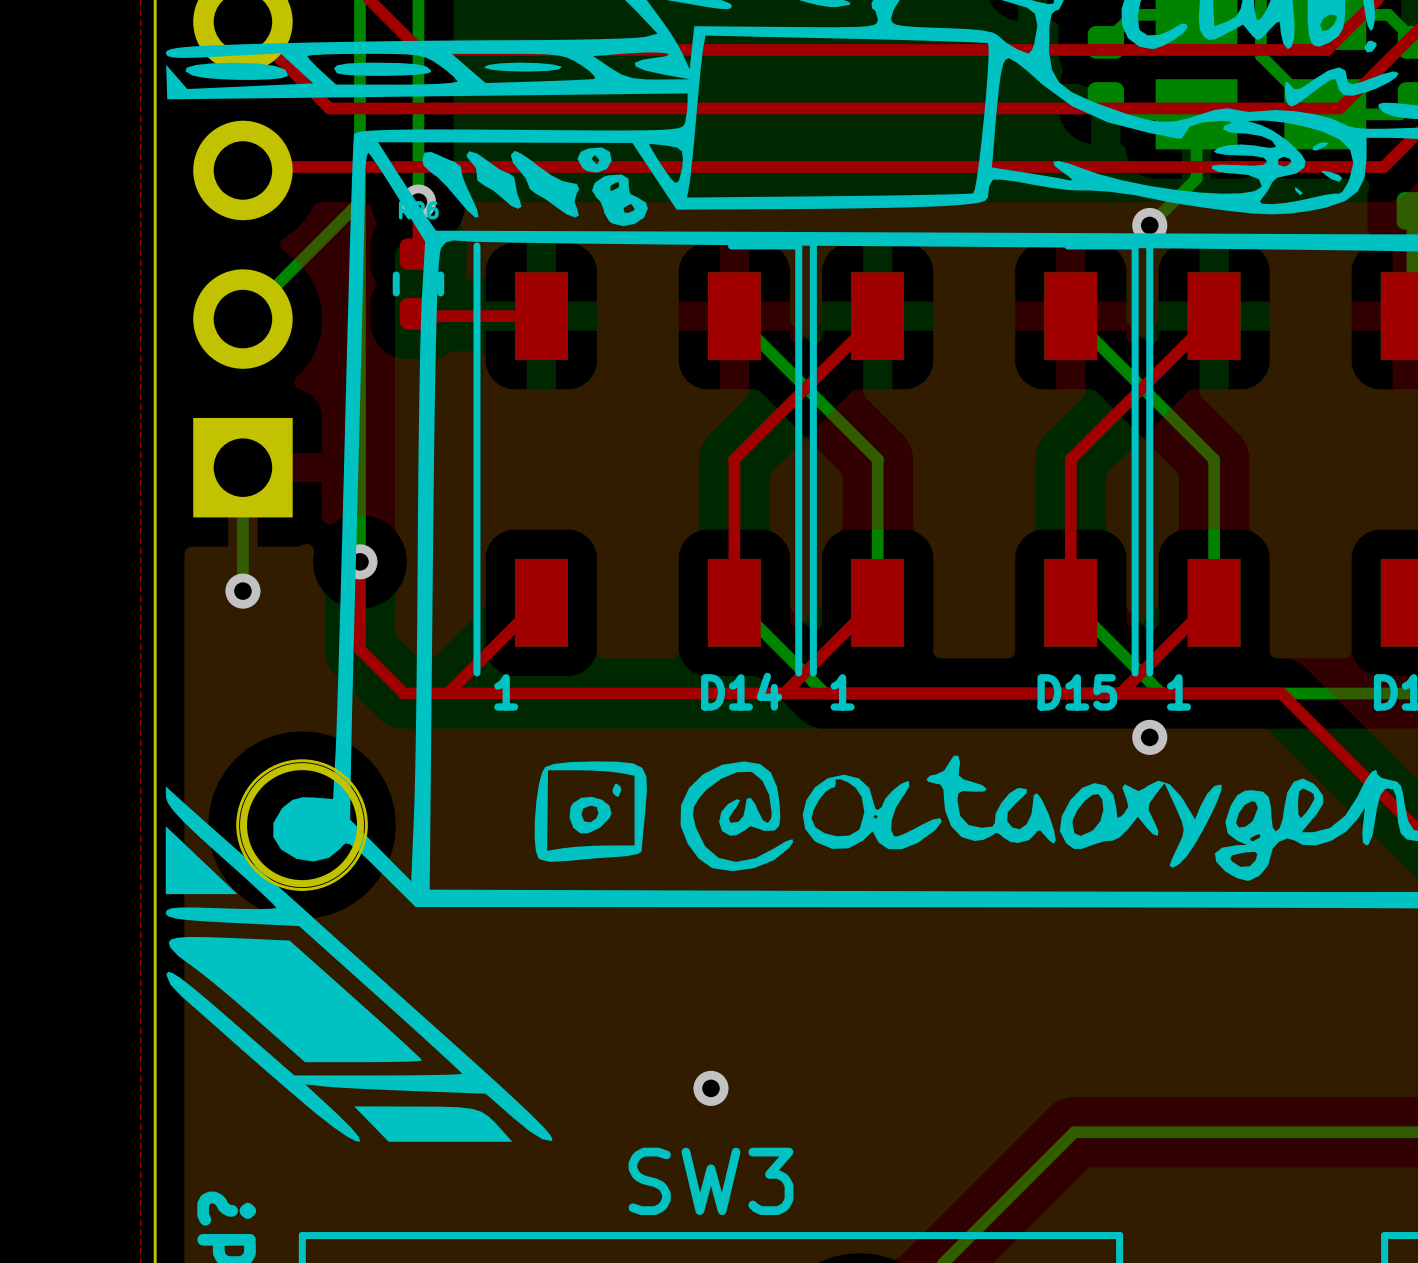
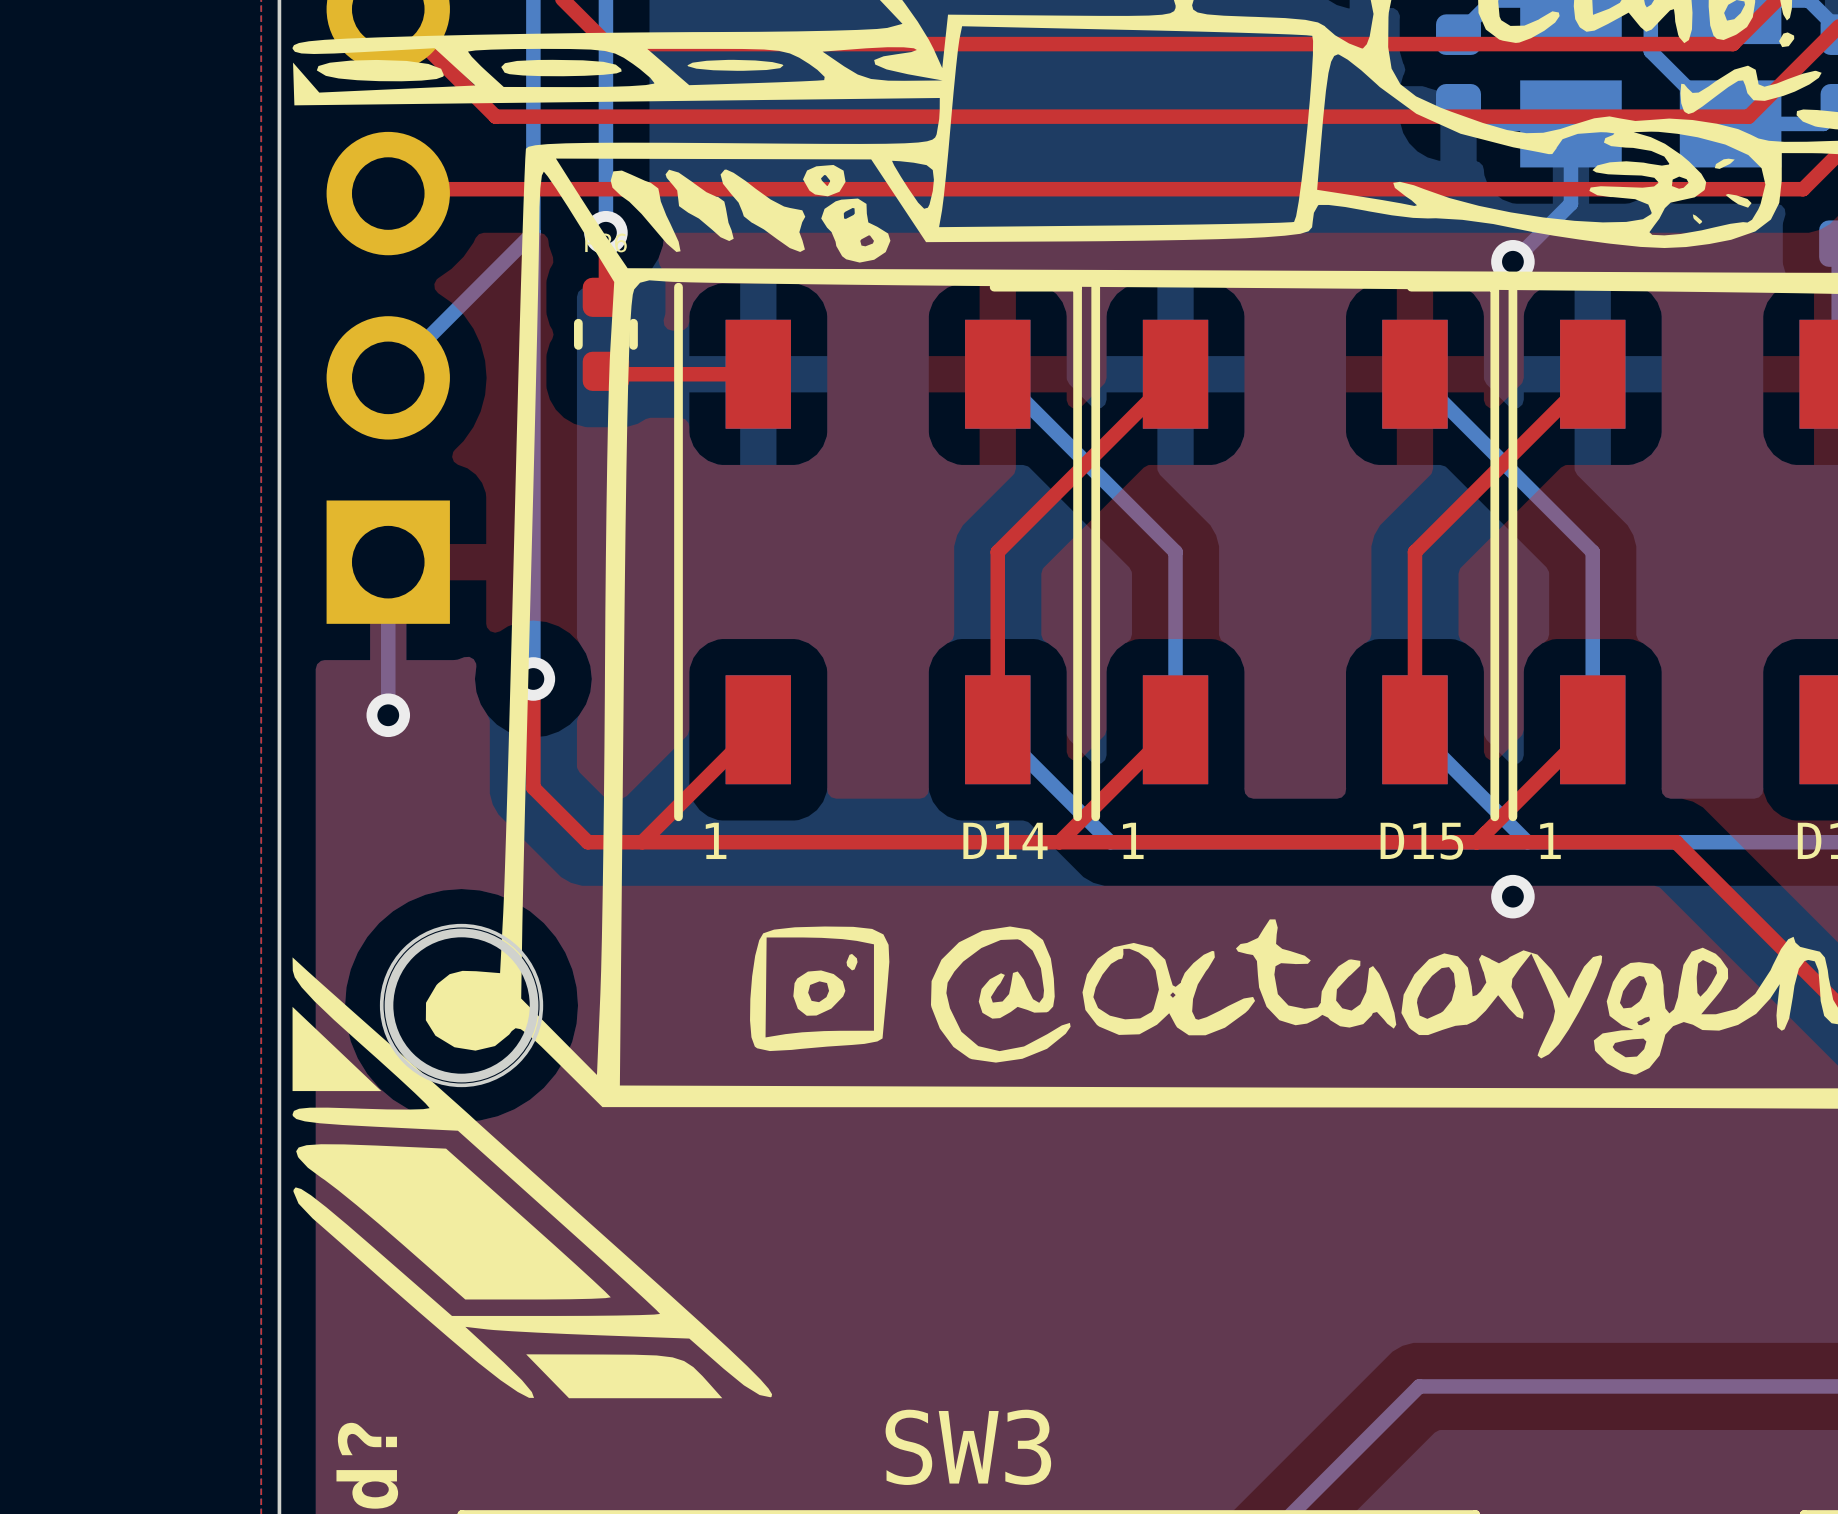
via: (710, 1088) -> none

